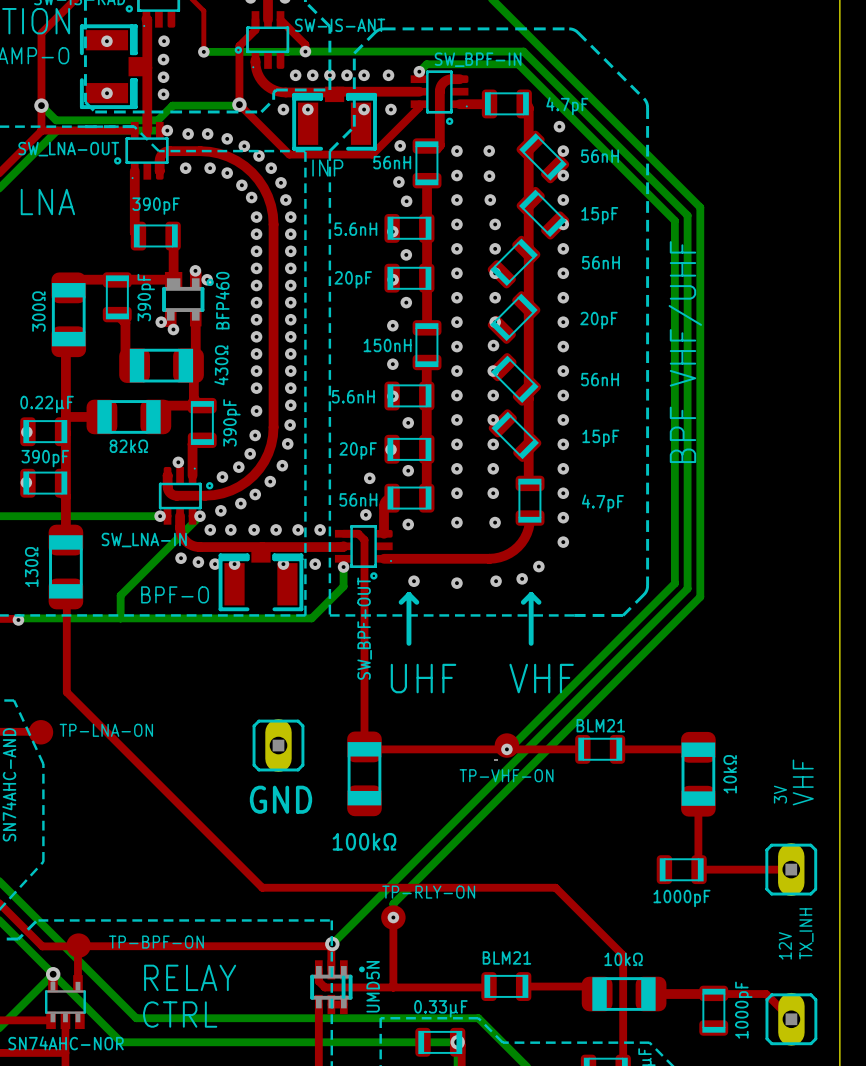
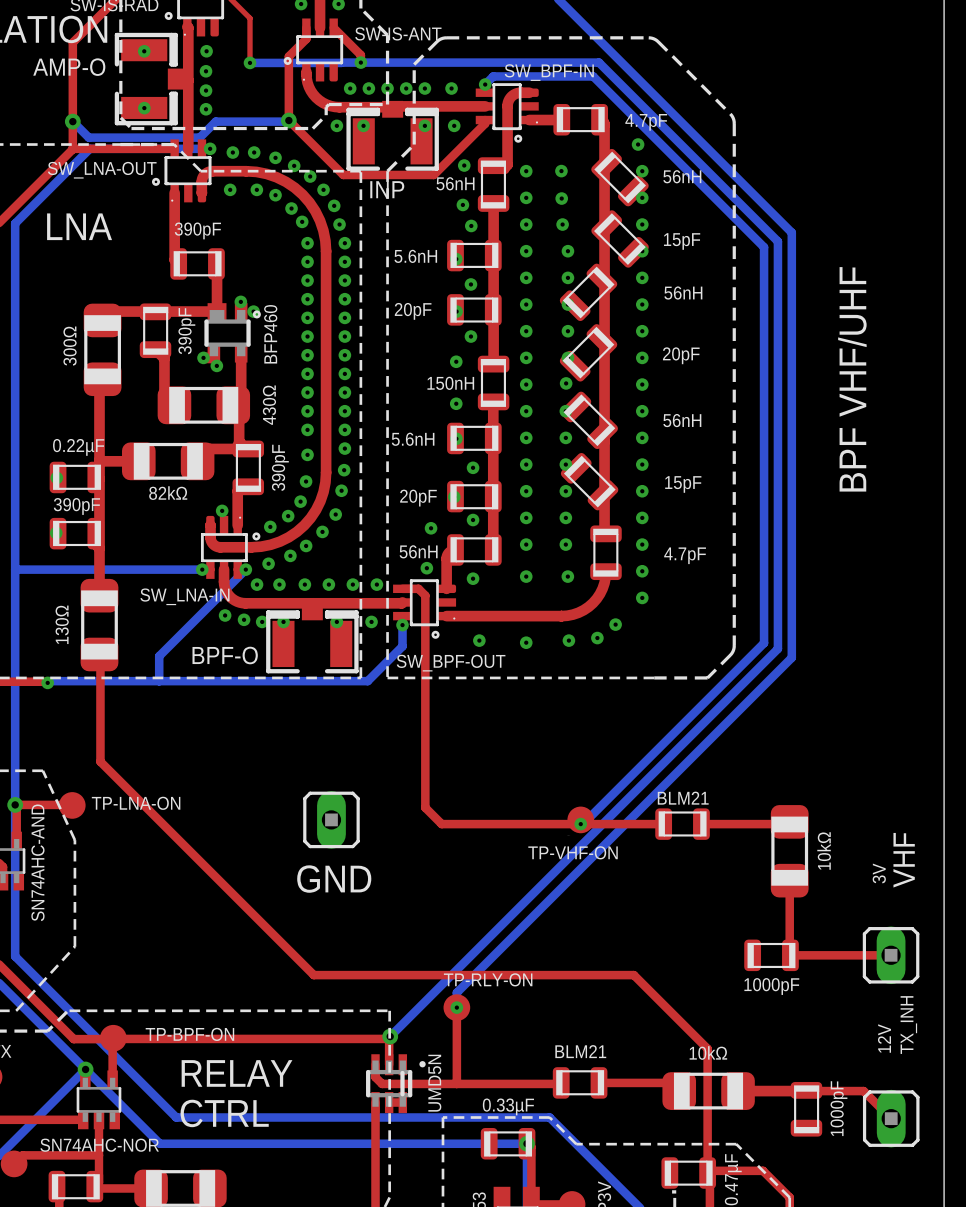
text position: BPF VHF/UHF (685, 352) -> BPF VHF/UHF (852, 379)
line: (408, 594) (408, 643) -> none
line: (408, 594) (416, 602) -> none
line: (408, 594) (401, 602) -> none
line: (531, 594) (531, 643) -> none
line: (531, 594) (538, 602) -> none
line: (531, 594) (523, 602) -> none
SW_BPF-OUT name rotation: 0° (364, 628) -> 90° clockwise (451, 663)
text: UHF (423, 678) -> none
text: VHF (541, 678) -> none
part: 100kΩ (364, 773) -> none

